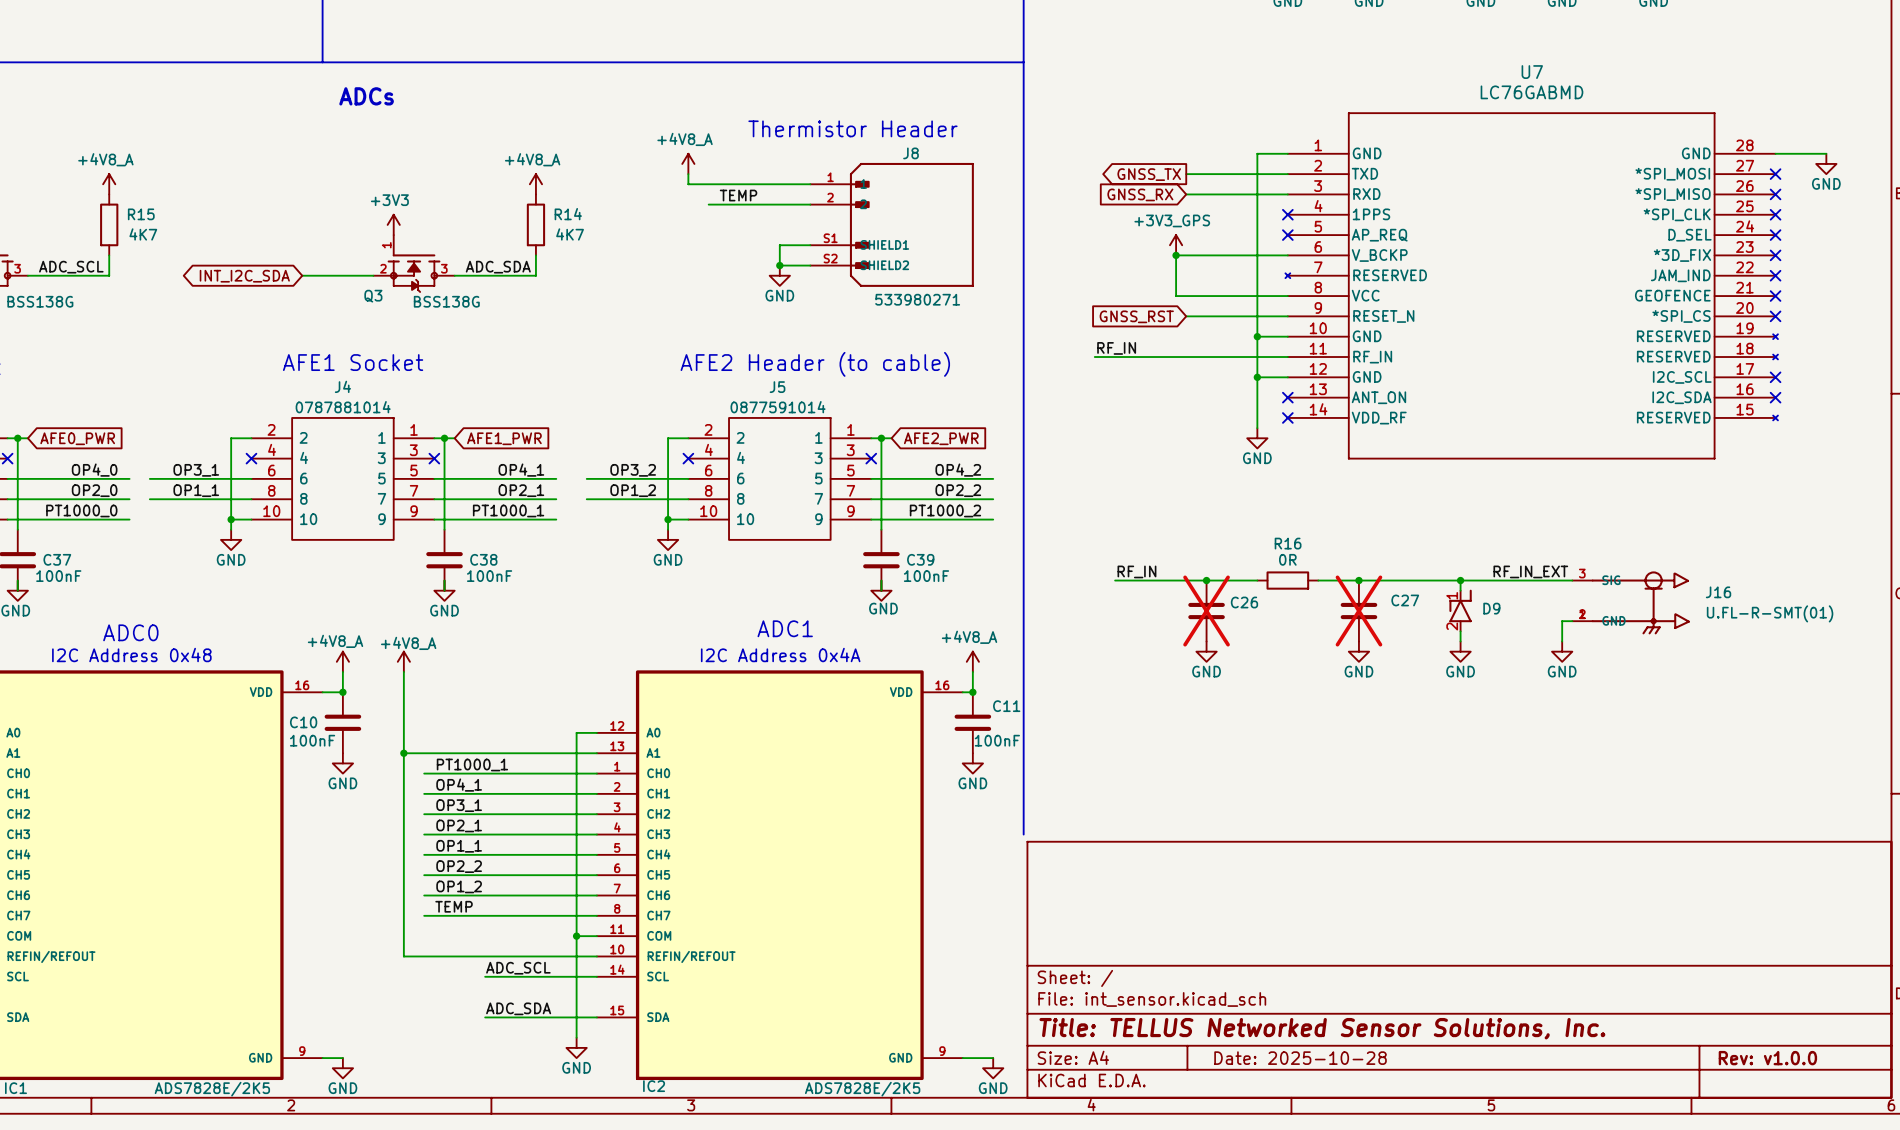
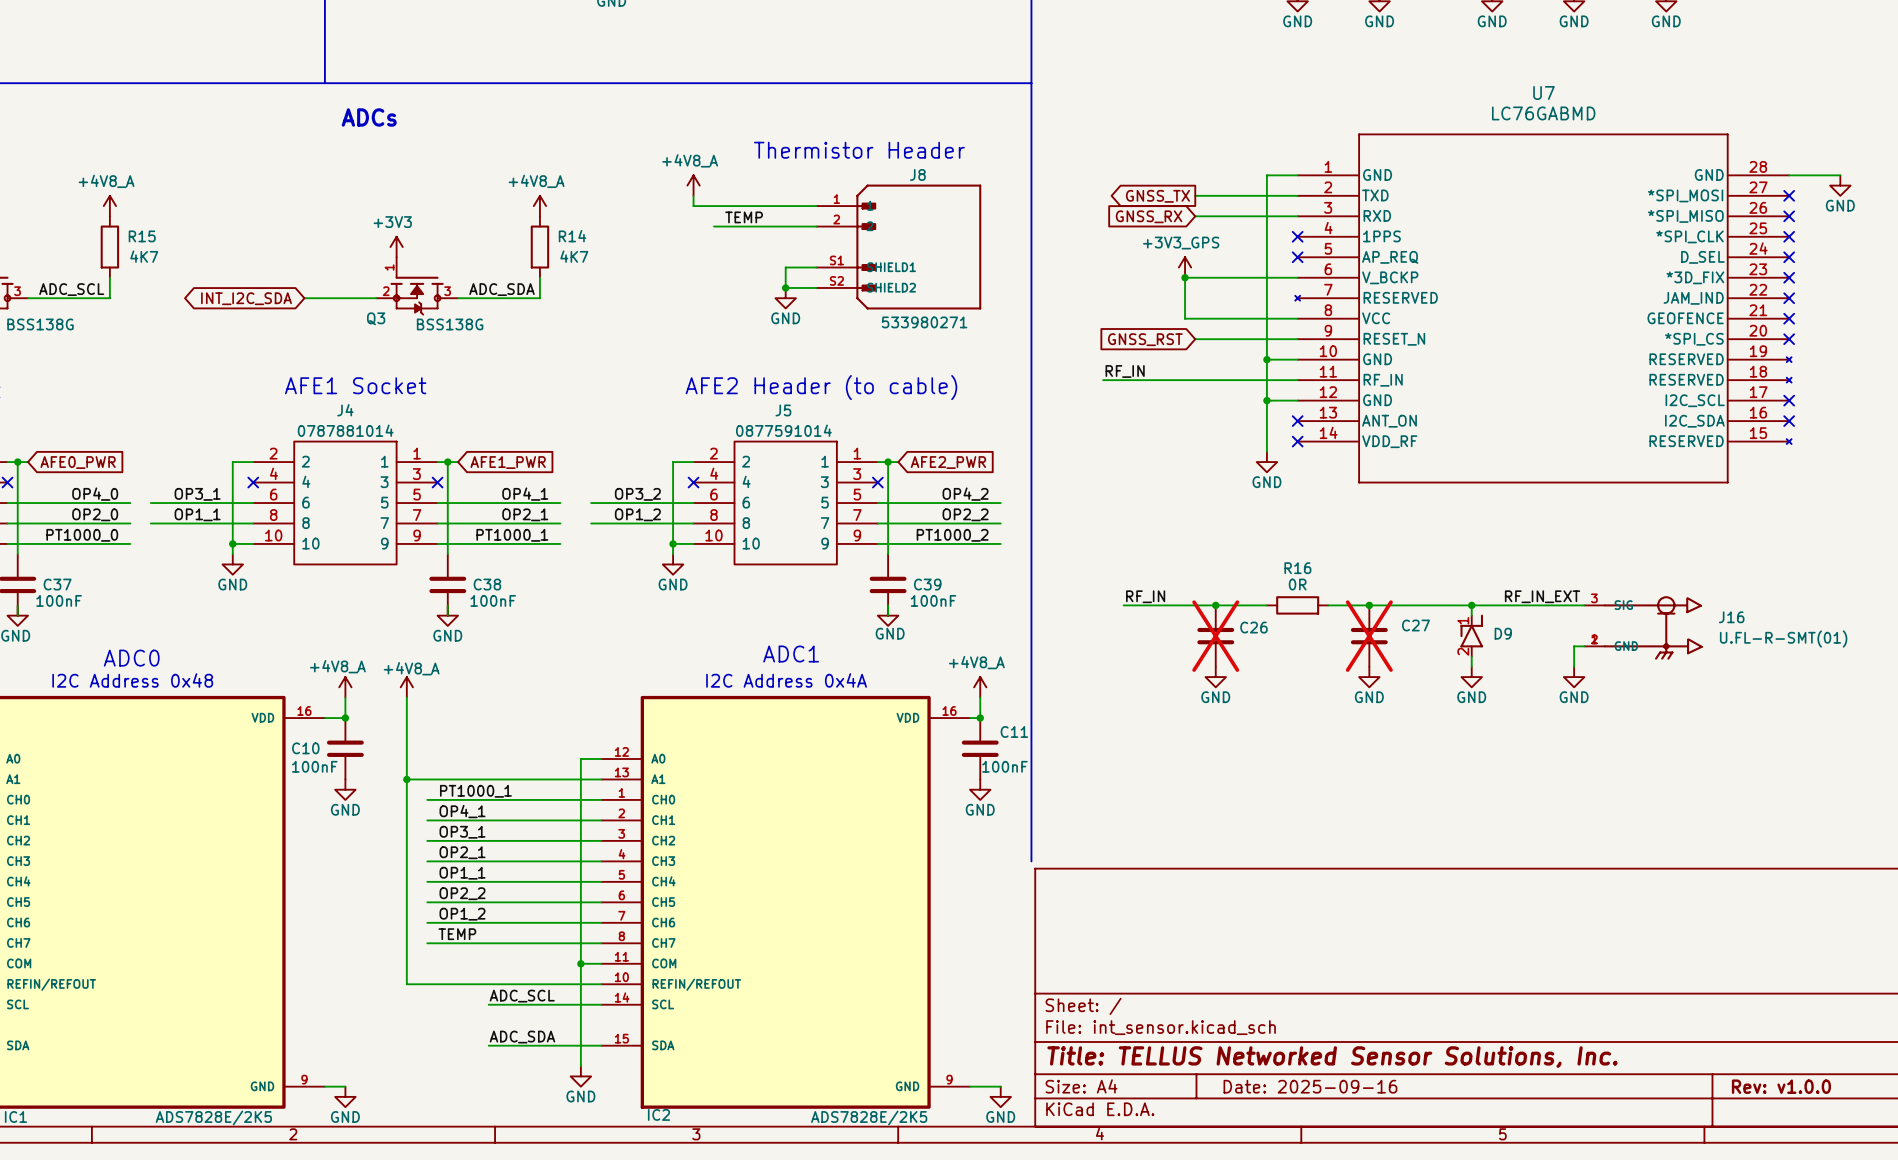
title block: Date: 2025-10-28 (1300, 1058) -> Date: 2025-09-16 (1310, 1086)

